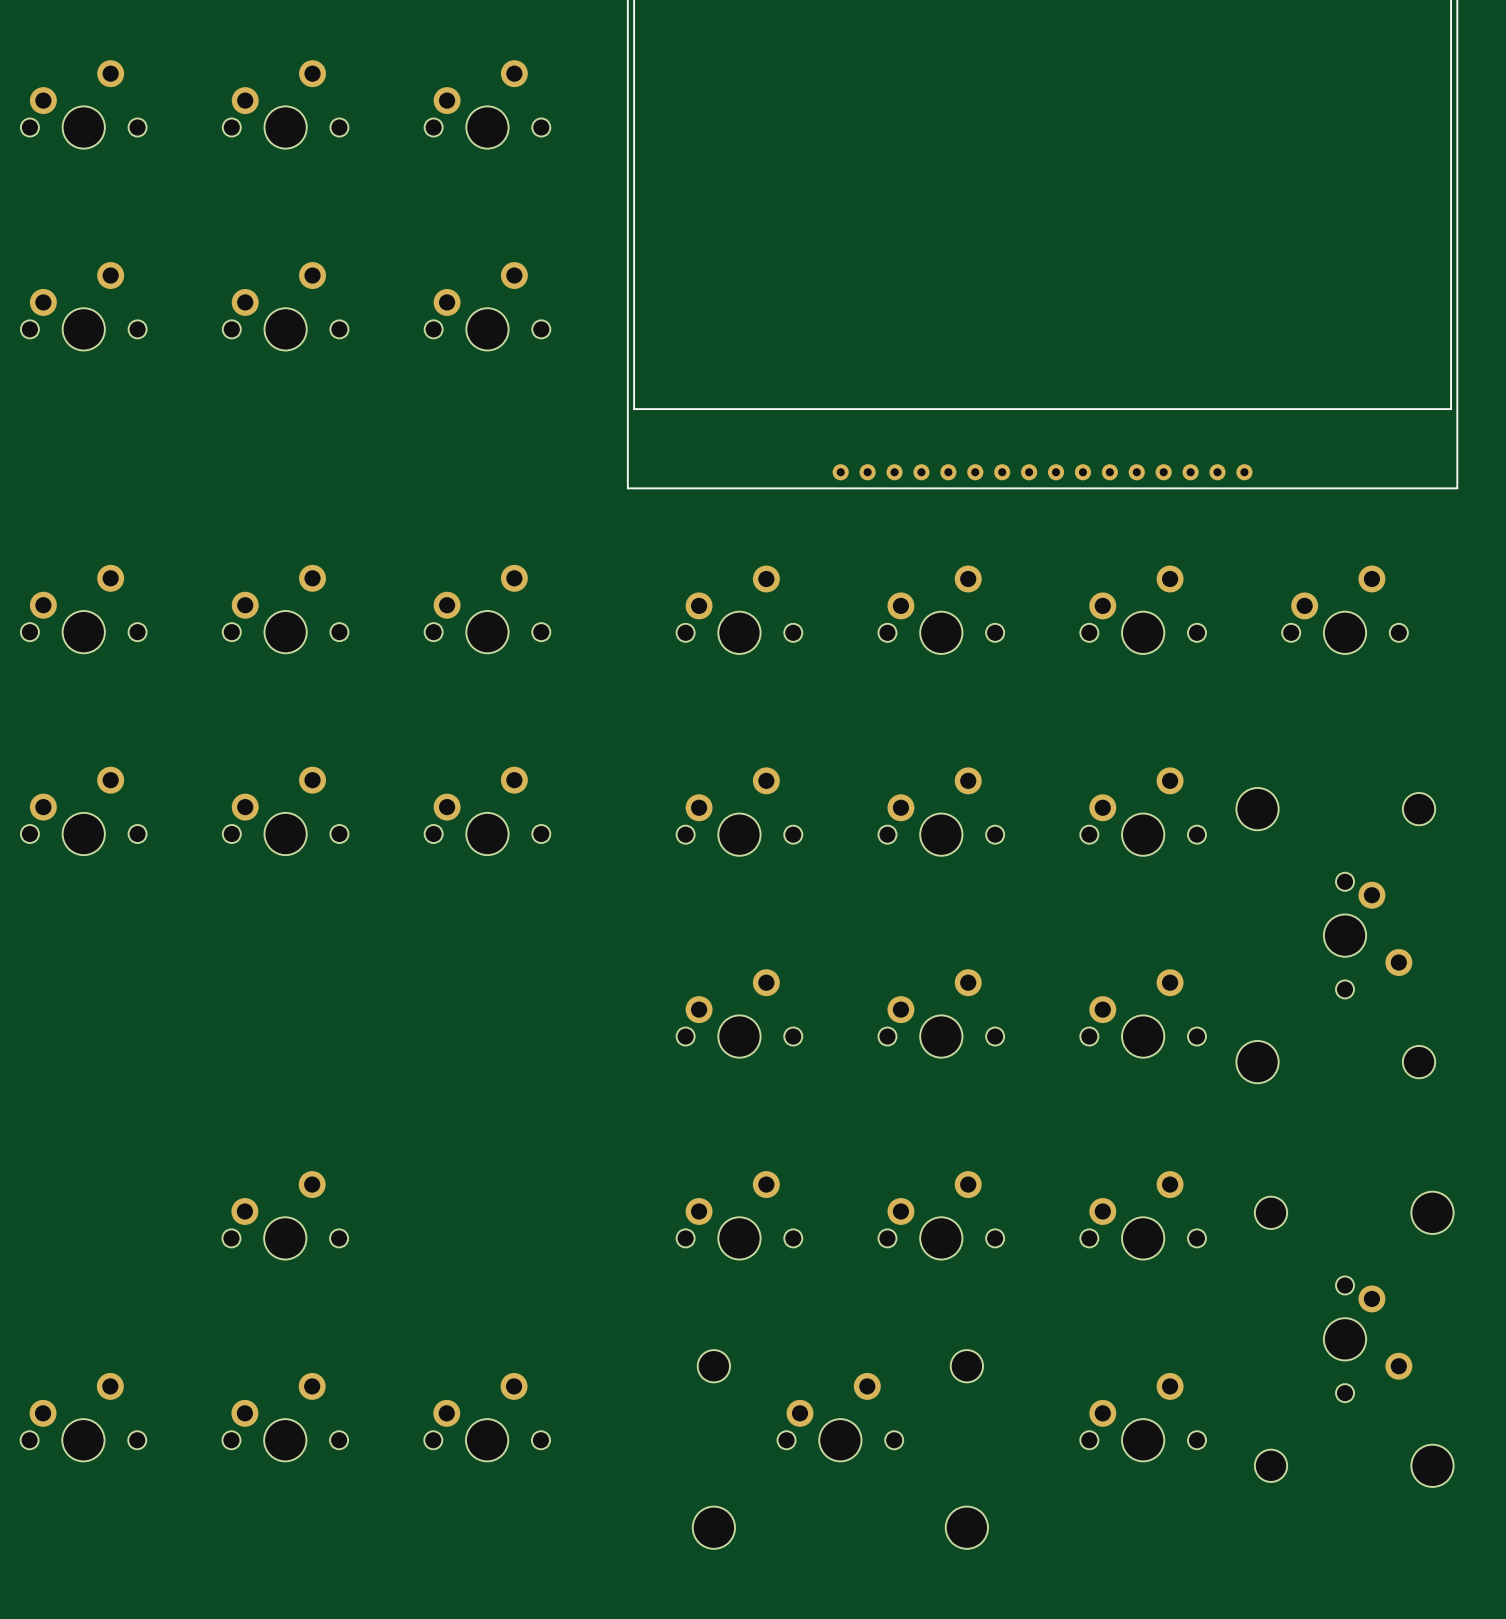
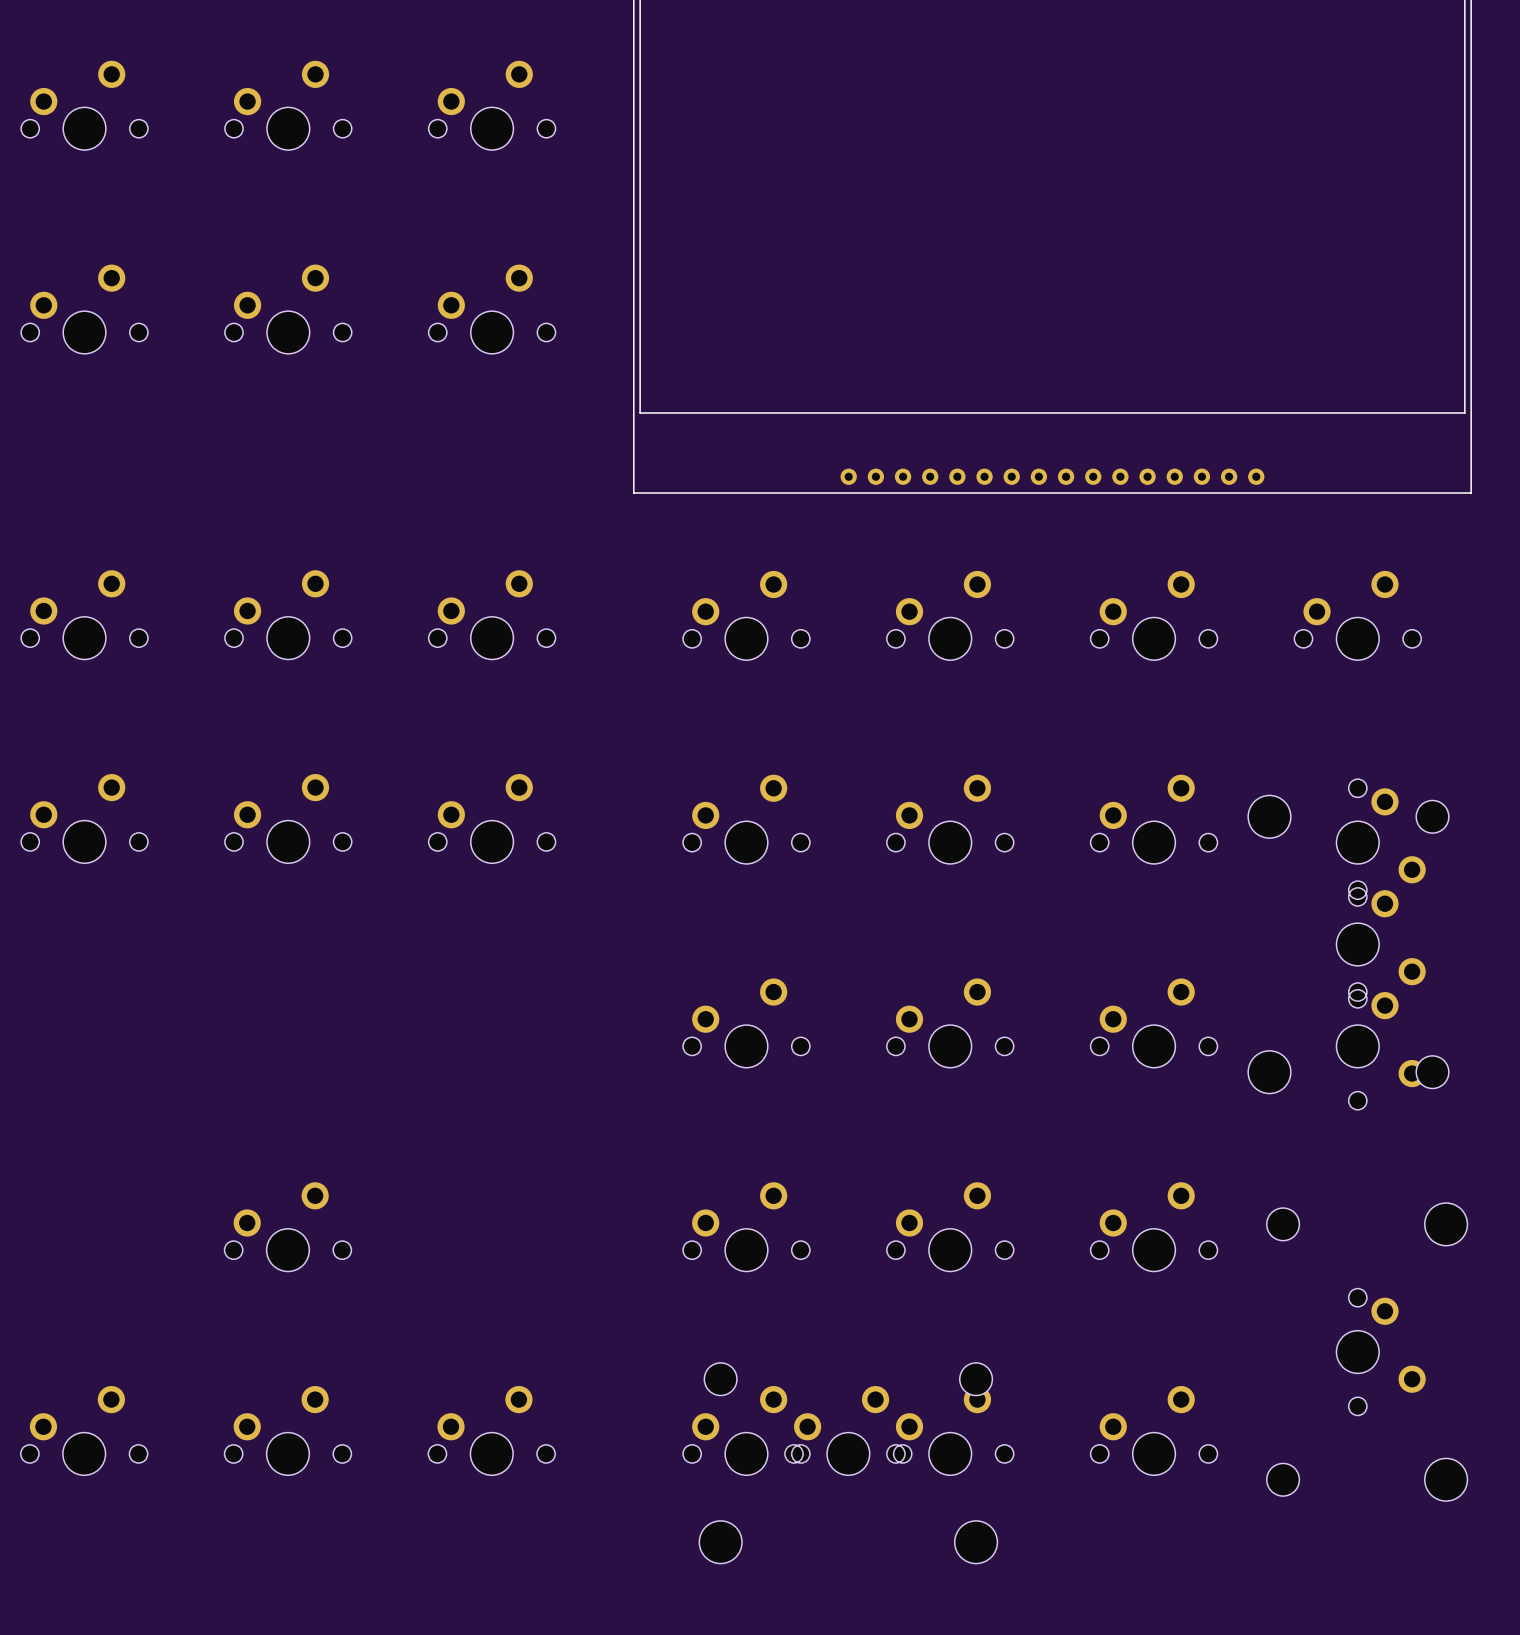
part: none -> (1381, 842)
part: none -> (1381, 1046)
part: none -> (746, 1430)
part: none -> (950, 1430)

